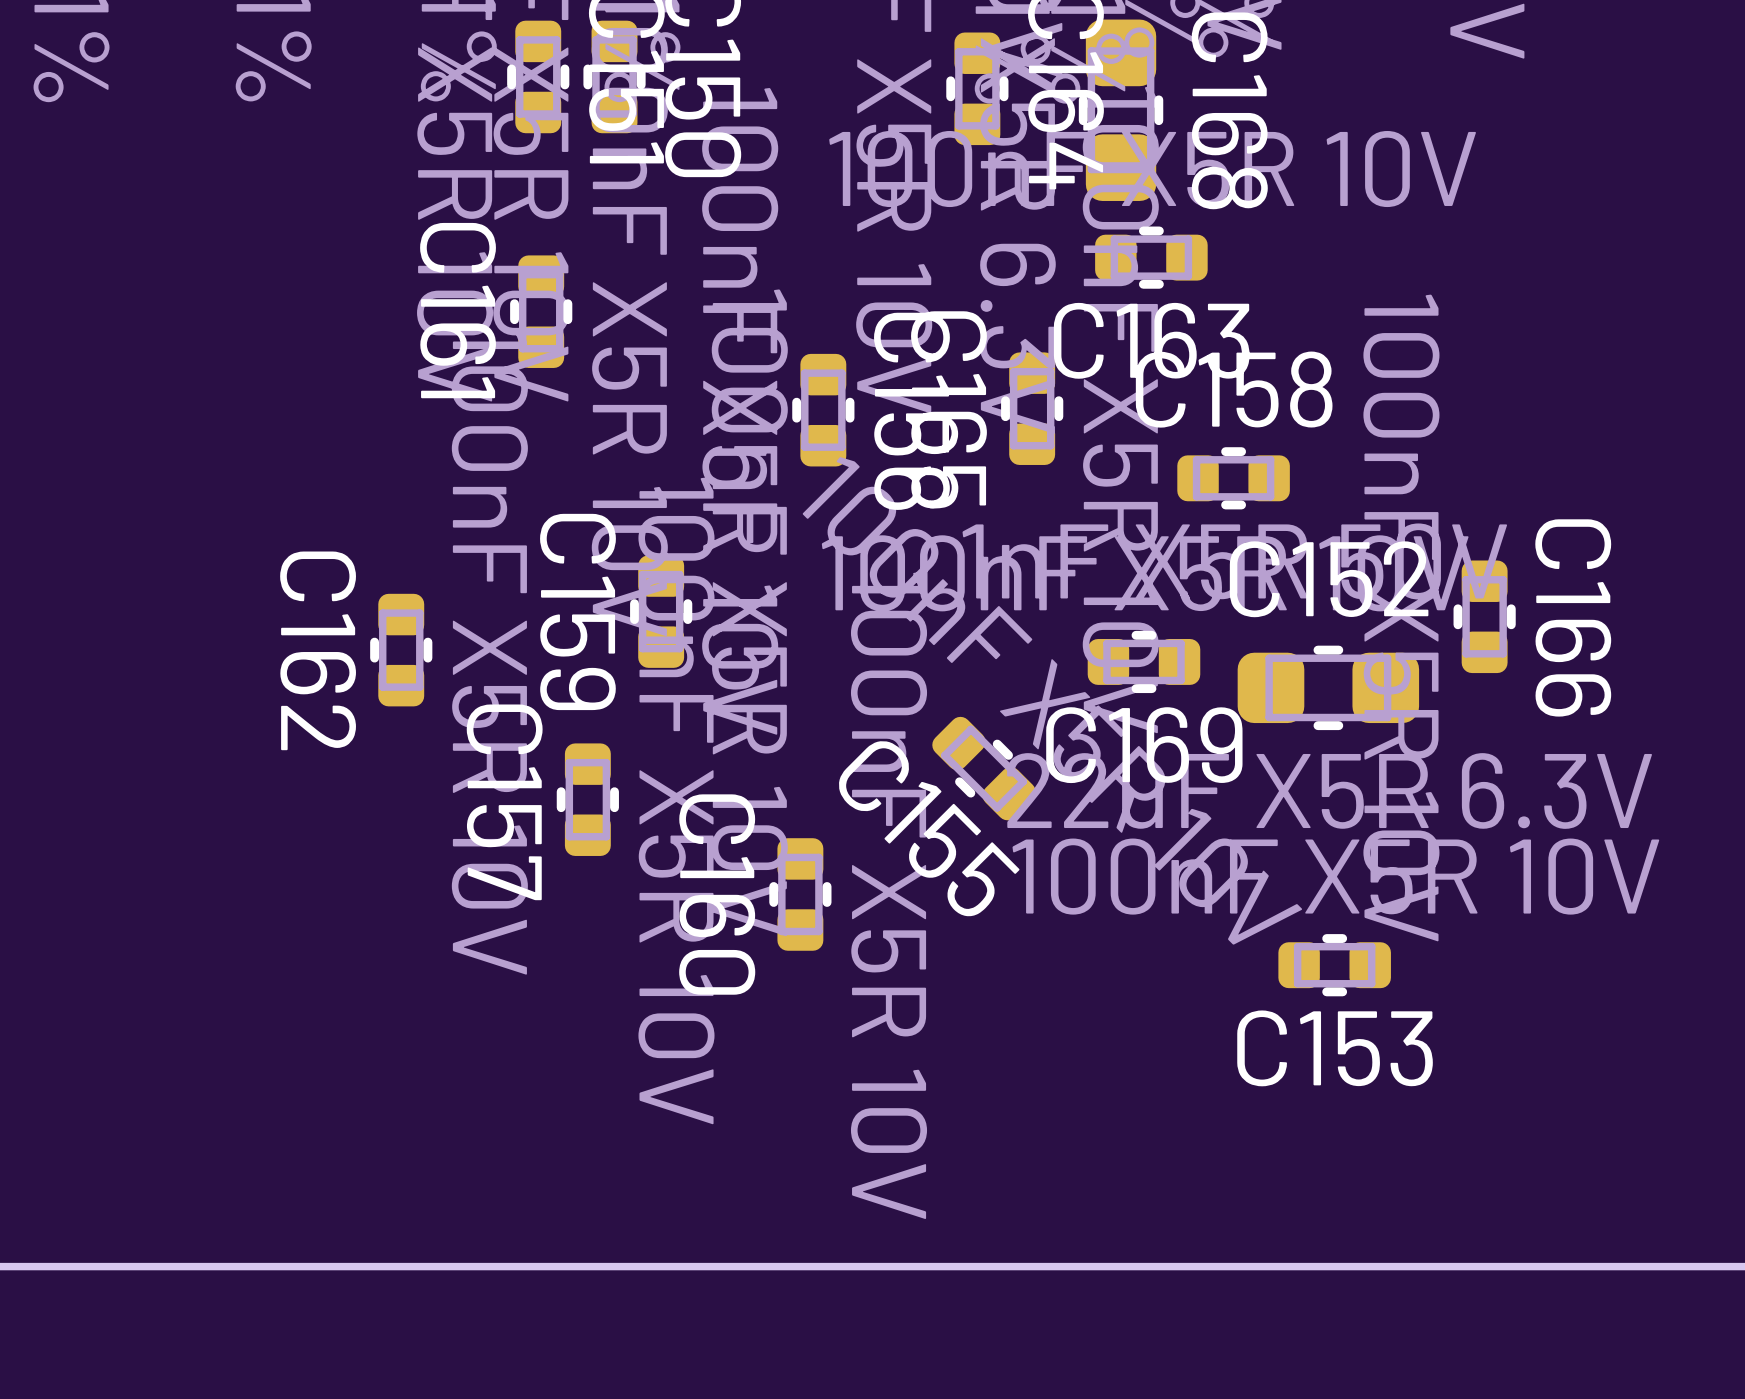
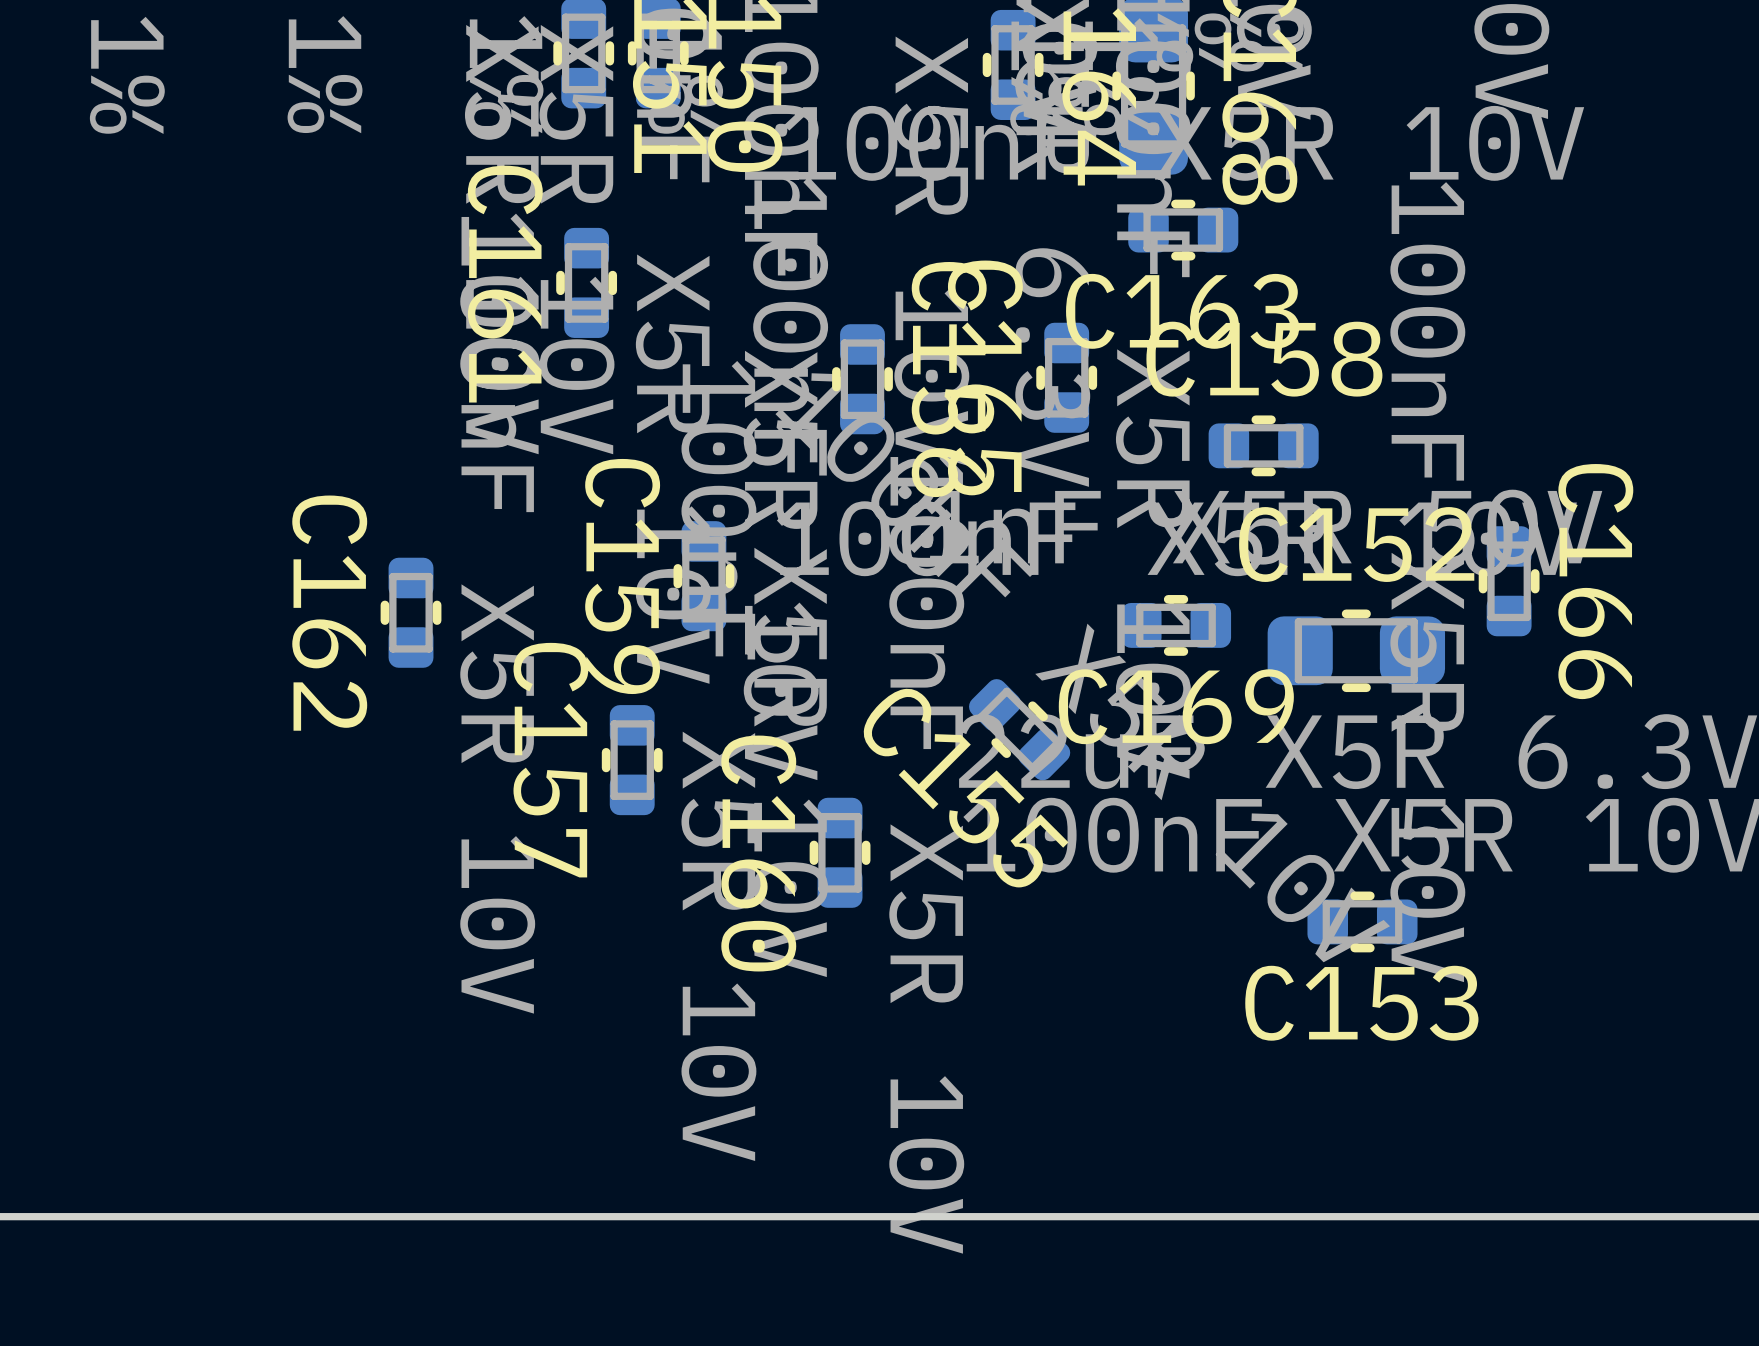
C162 position: (401, 650) -> (411, 612)

